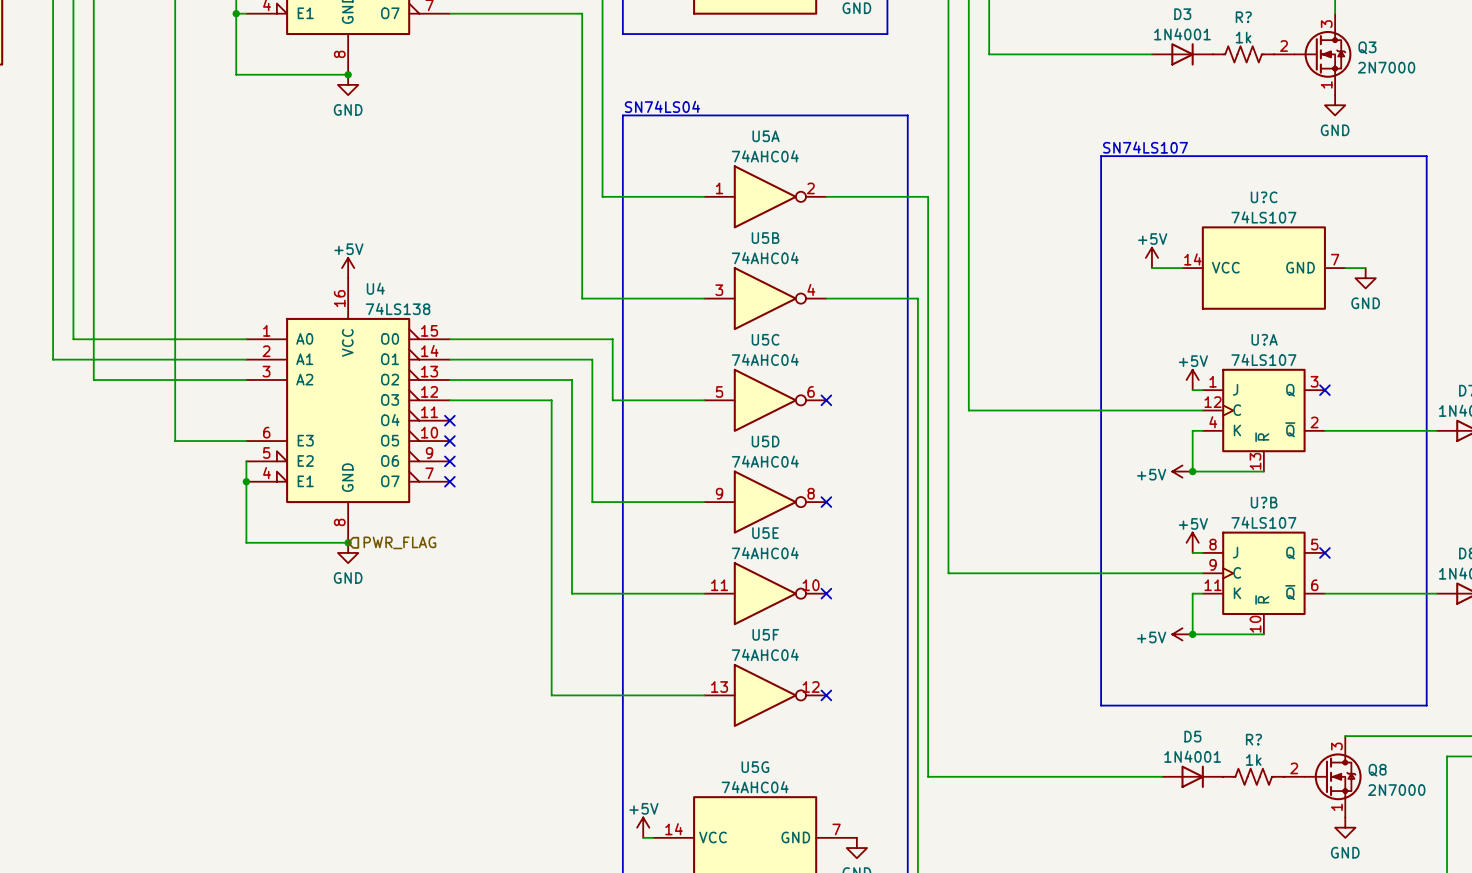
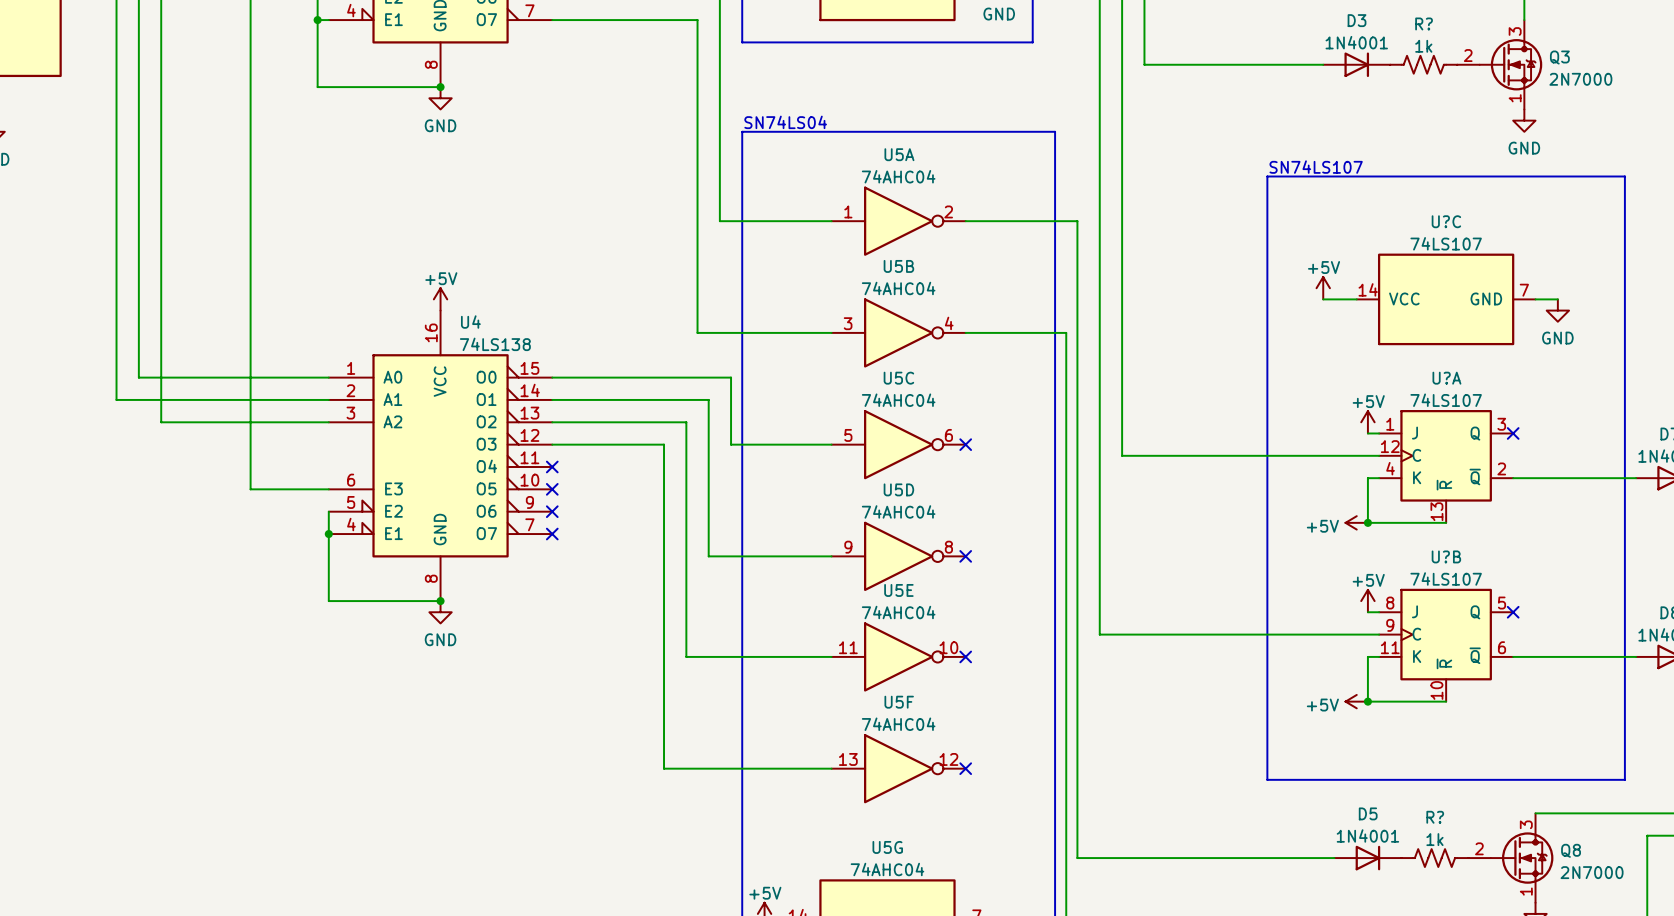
hierarchical label: PWR_FLAG (399, 542) -> none

